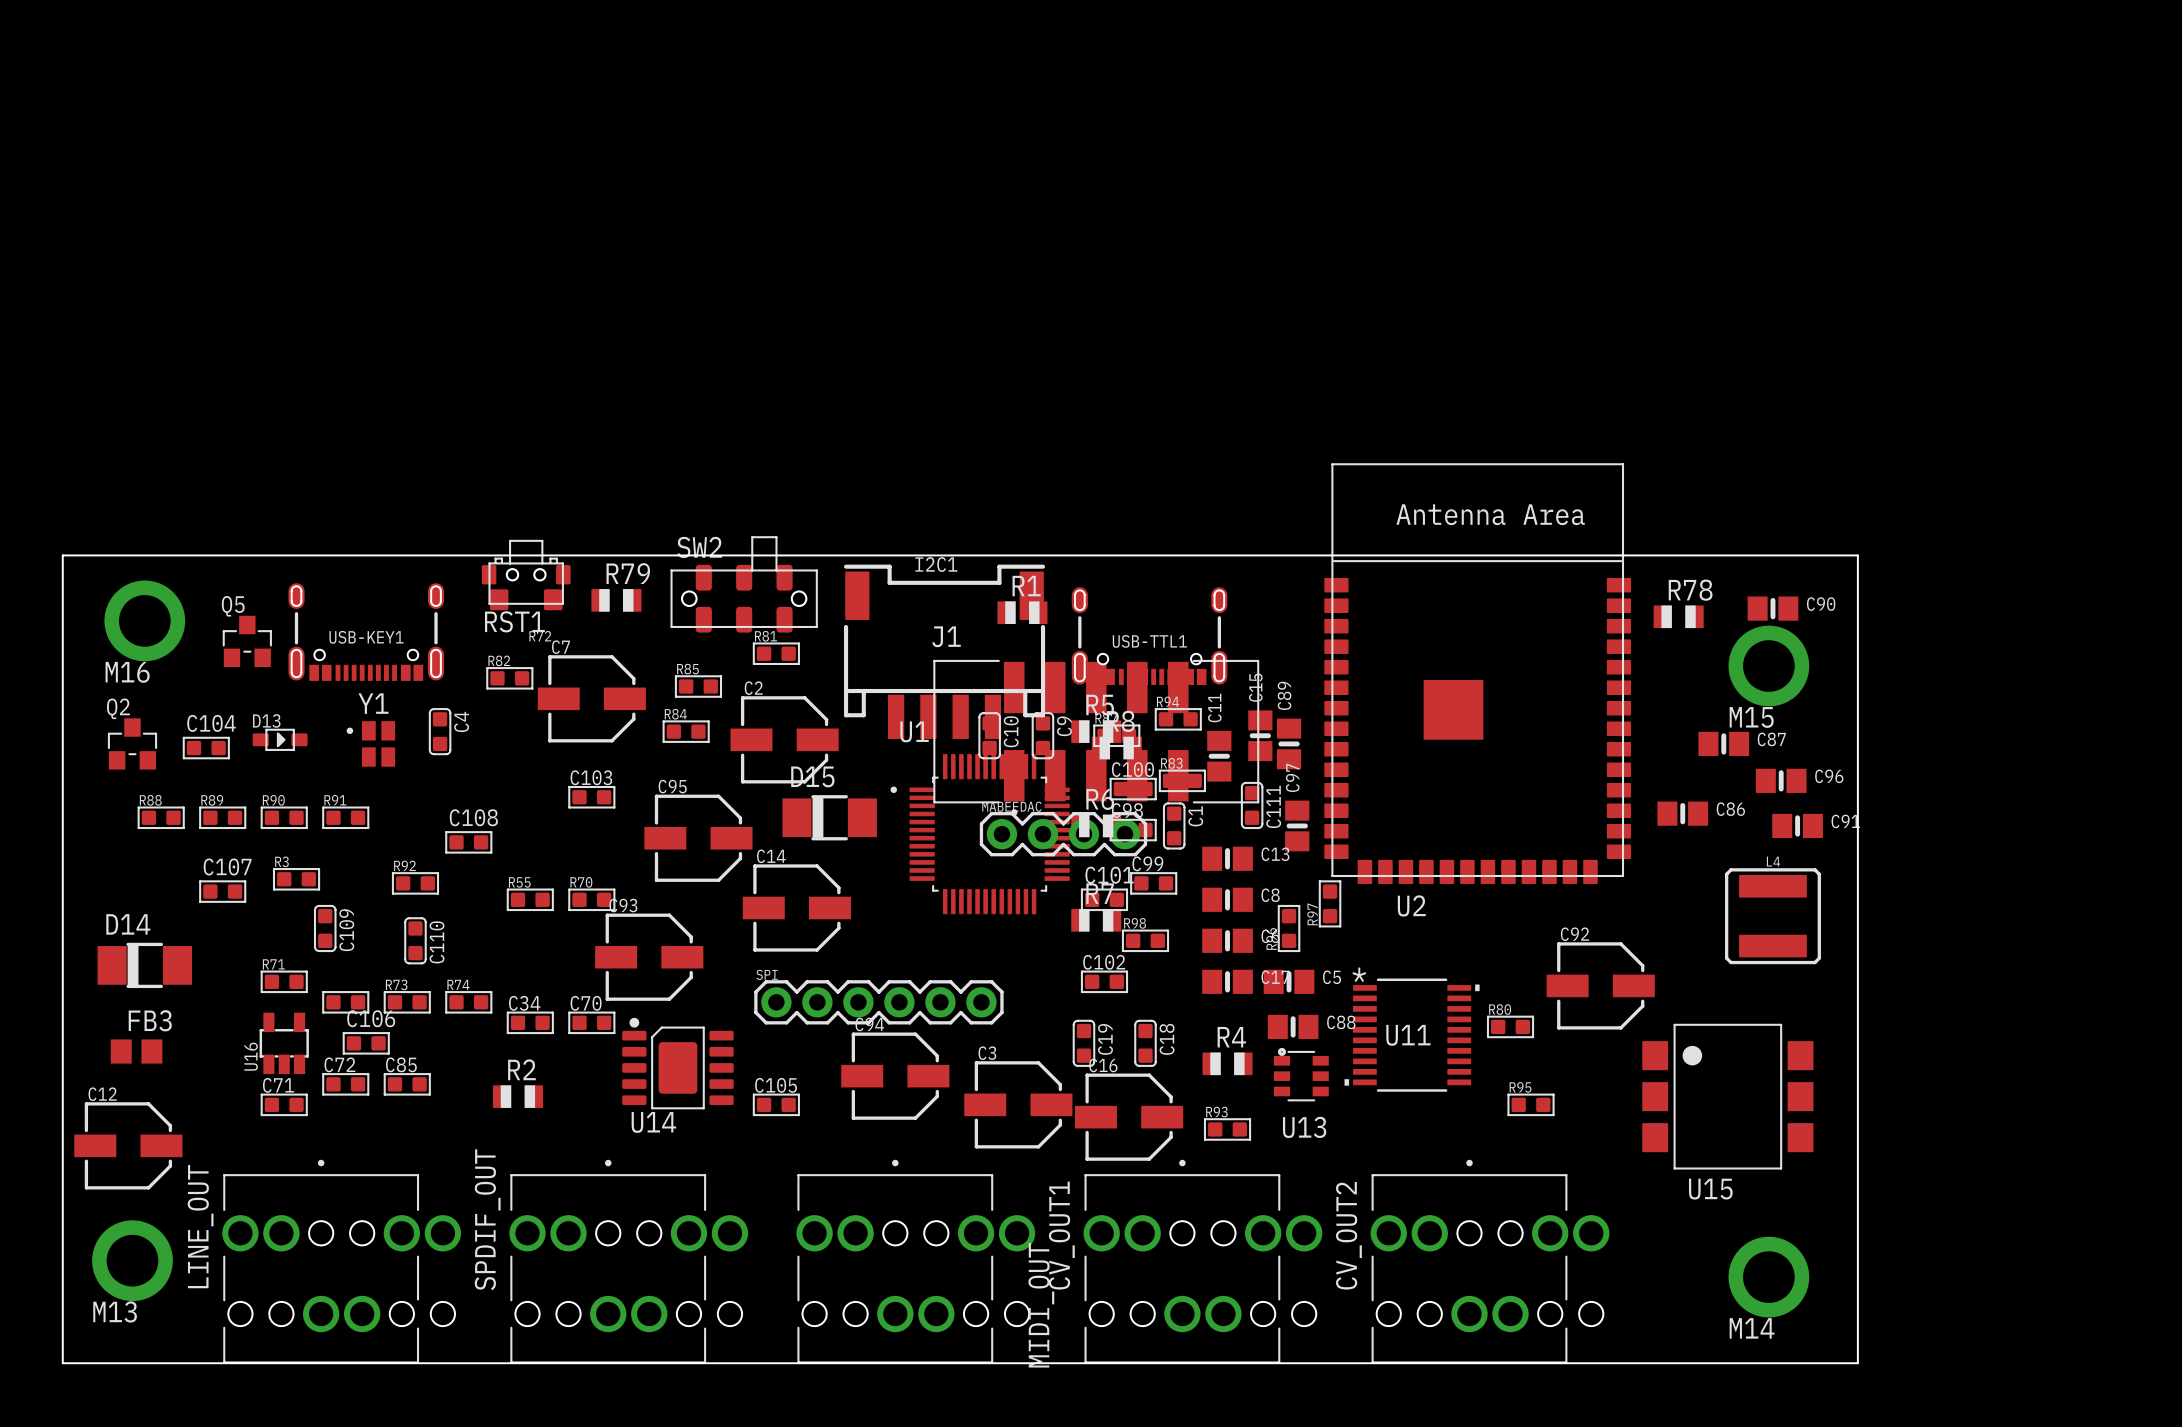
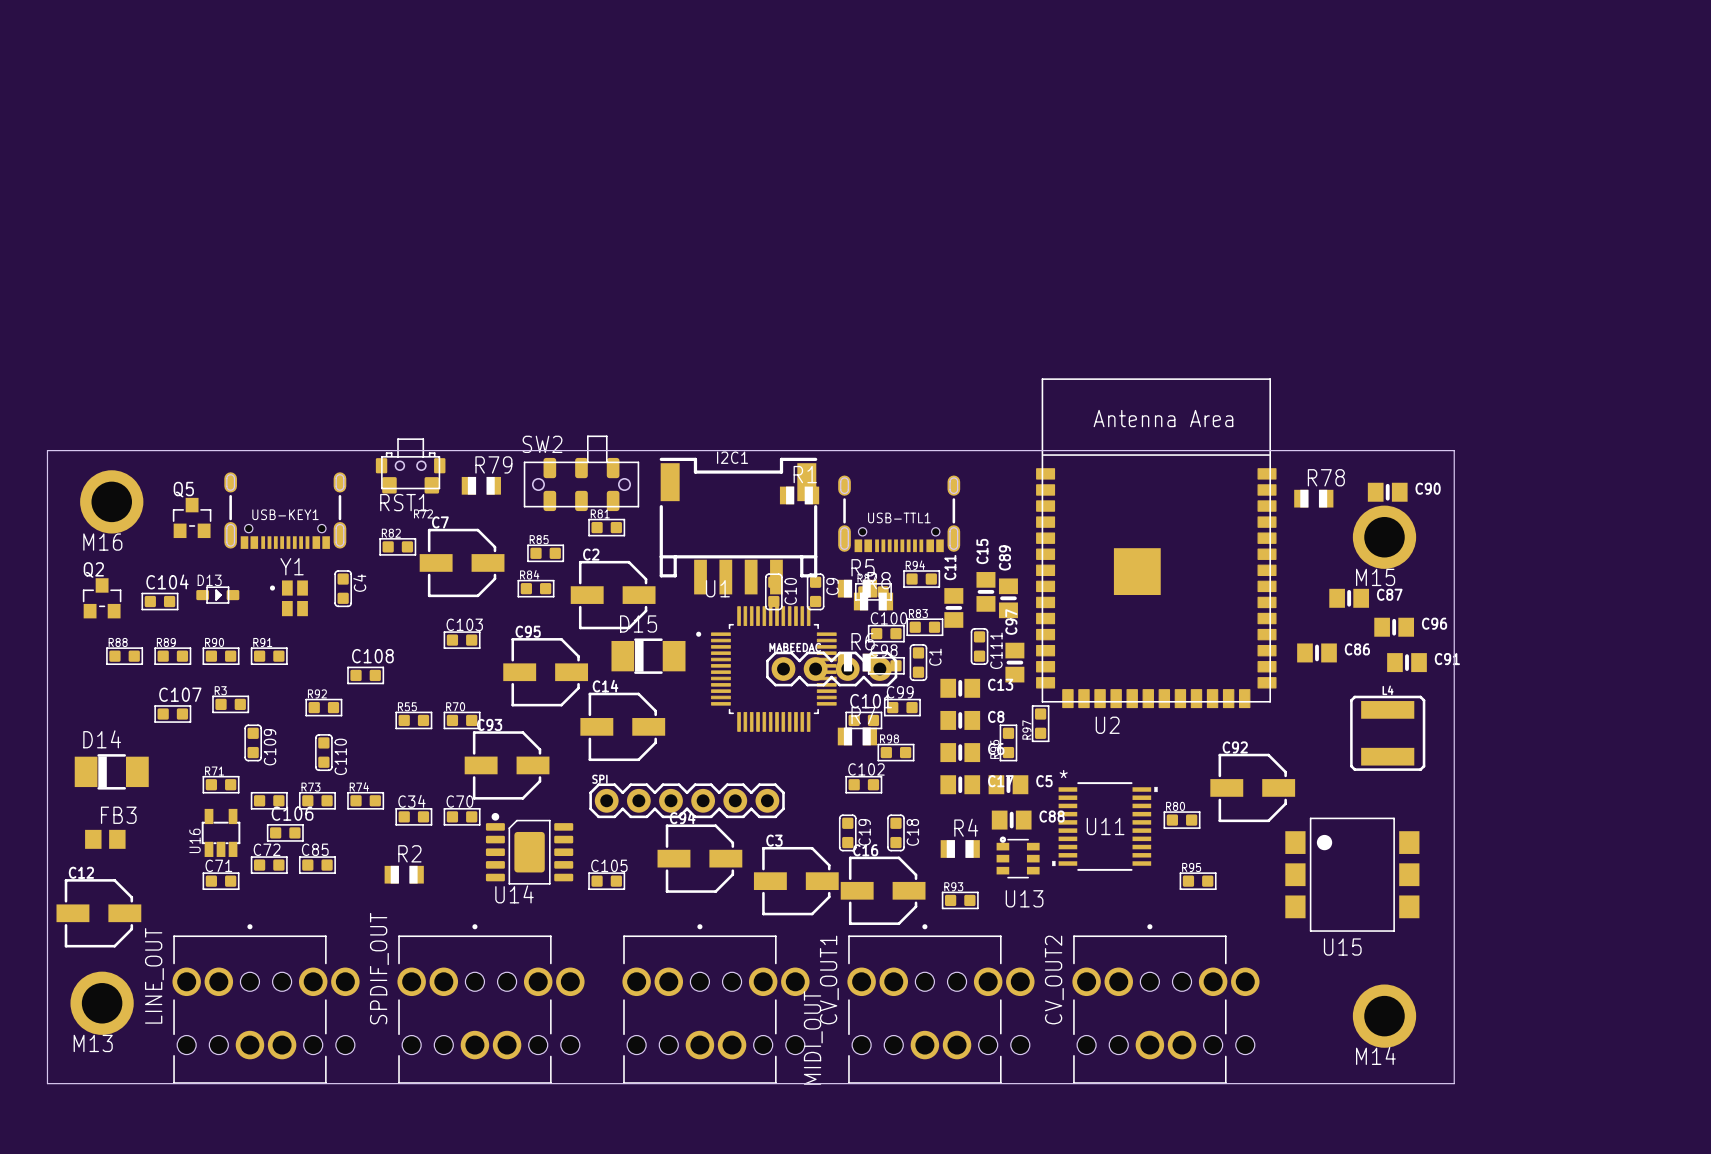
J1: (1096, 737) -> none

